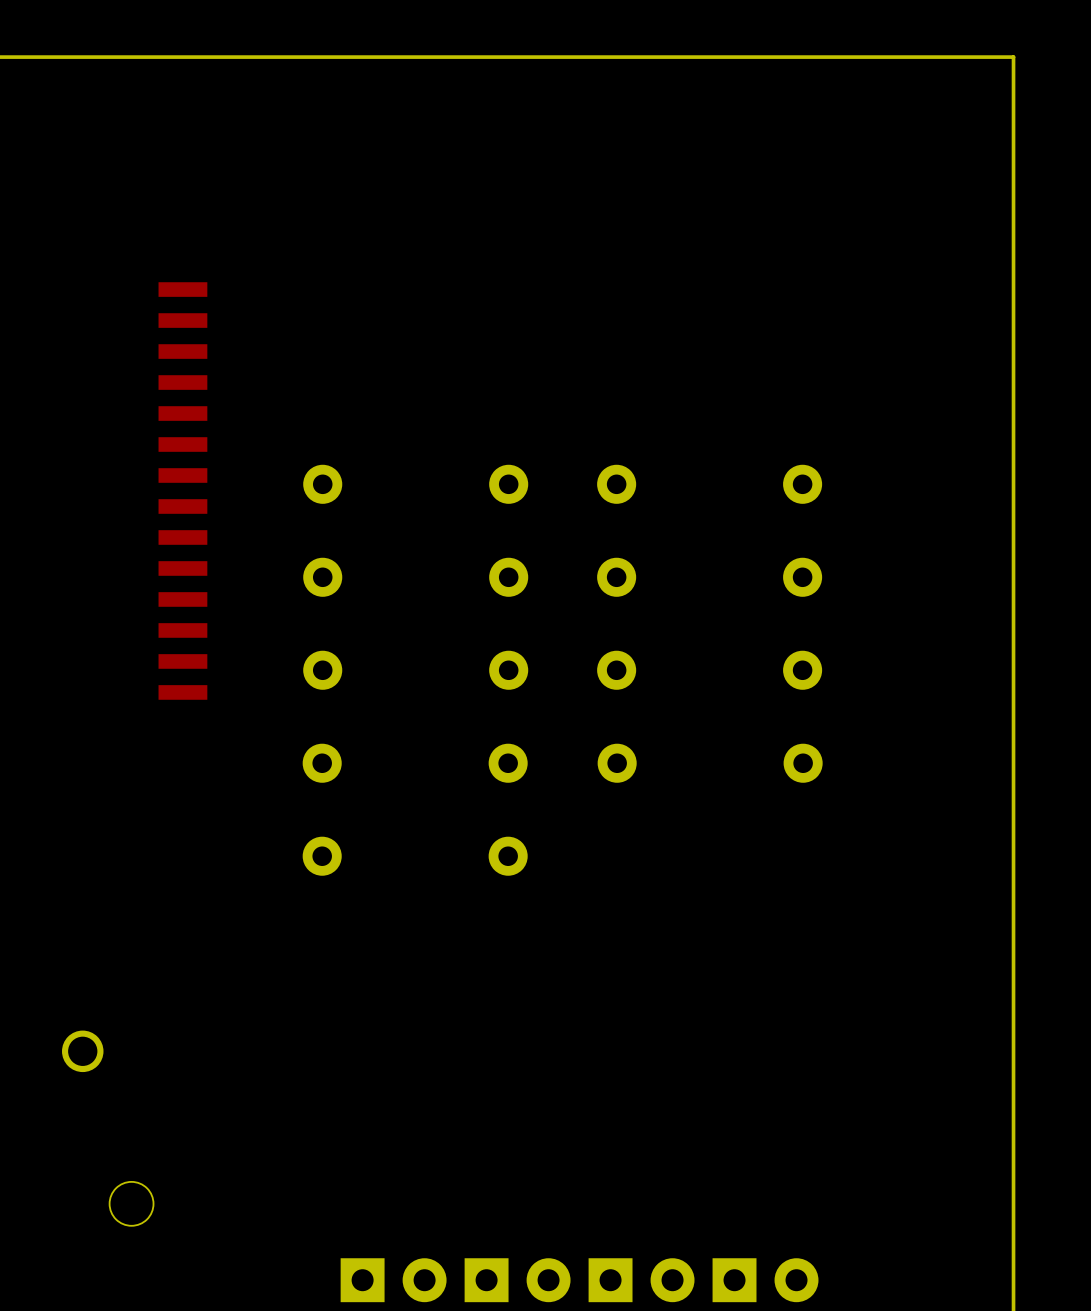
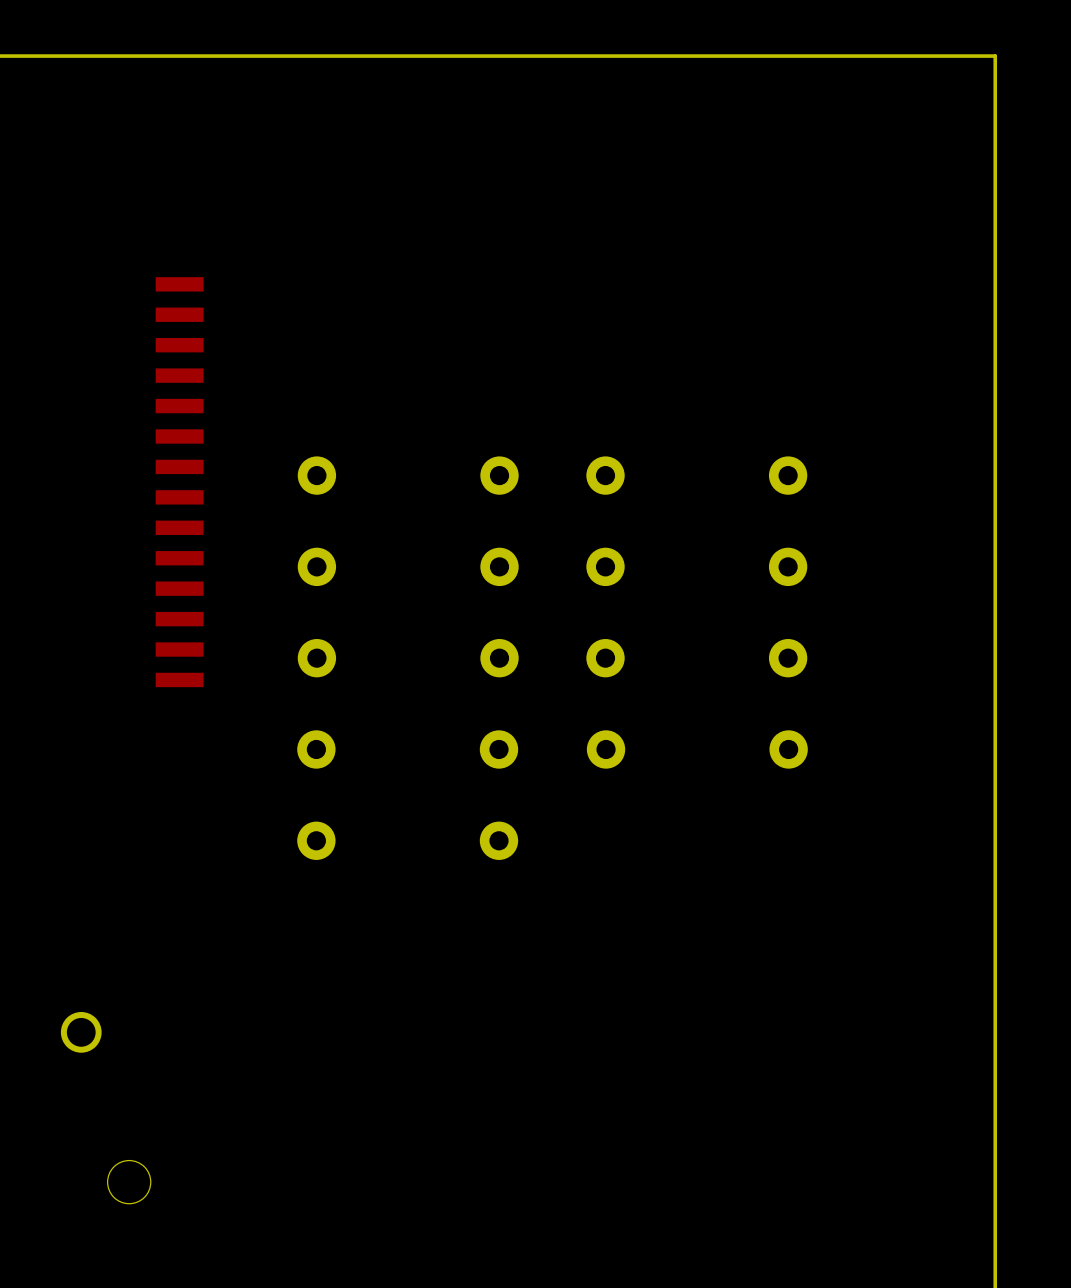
part: (393, 1280) -> none
part: (517, 1280) -> none
part: (641, 1280) -> none
part: (765, 1280) -> none

